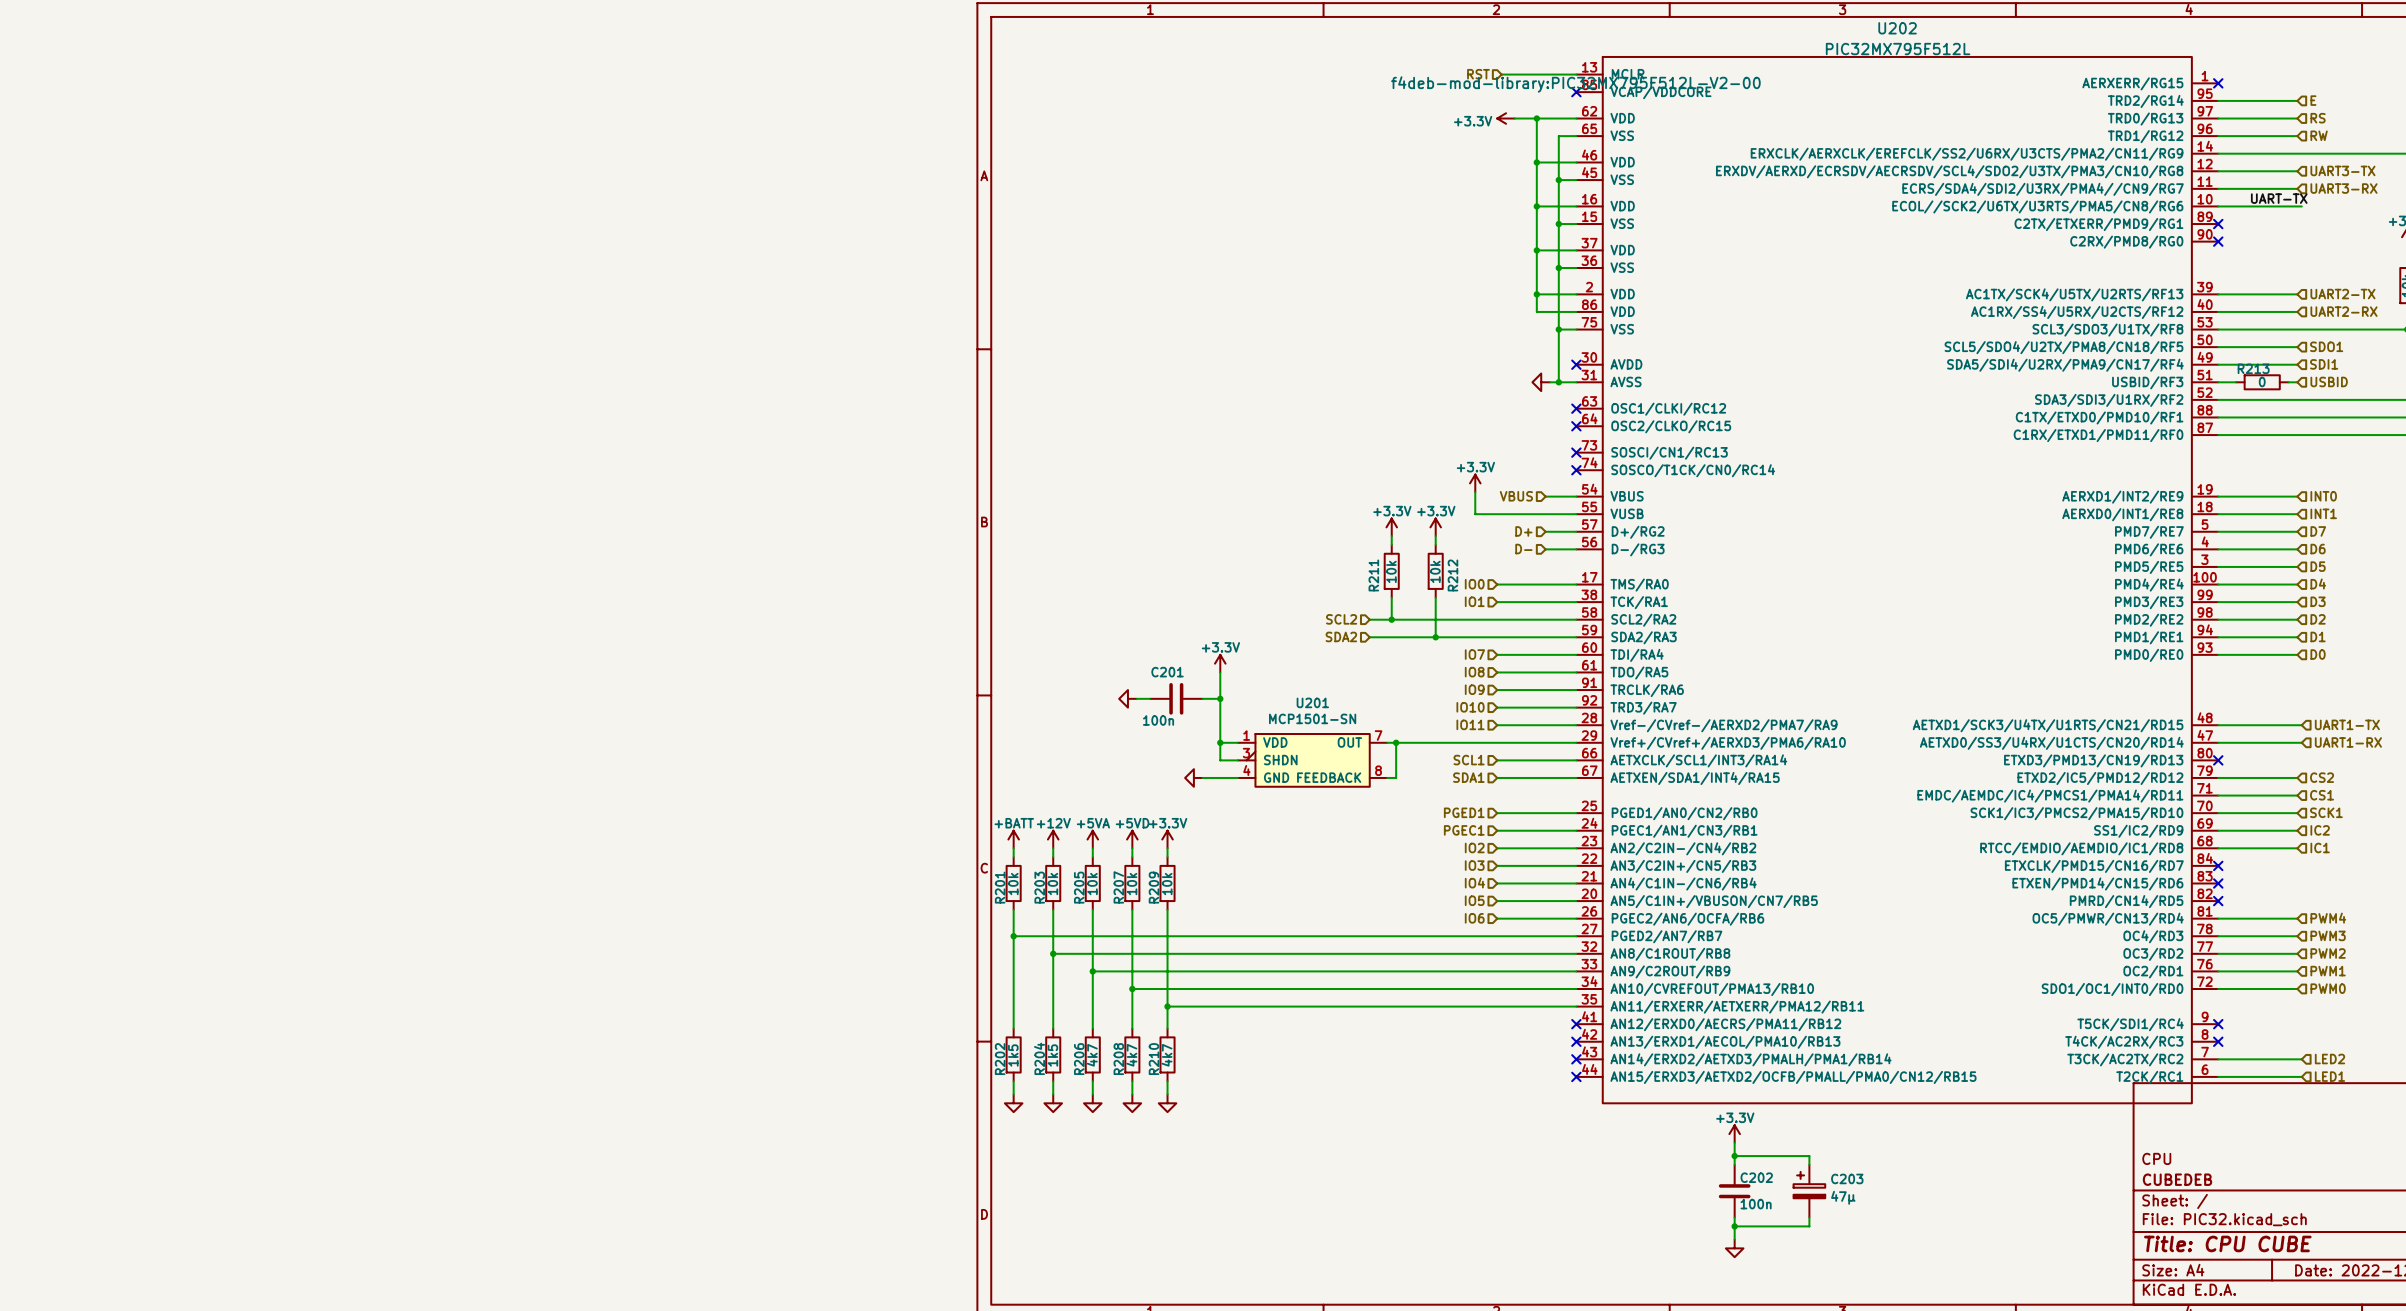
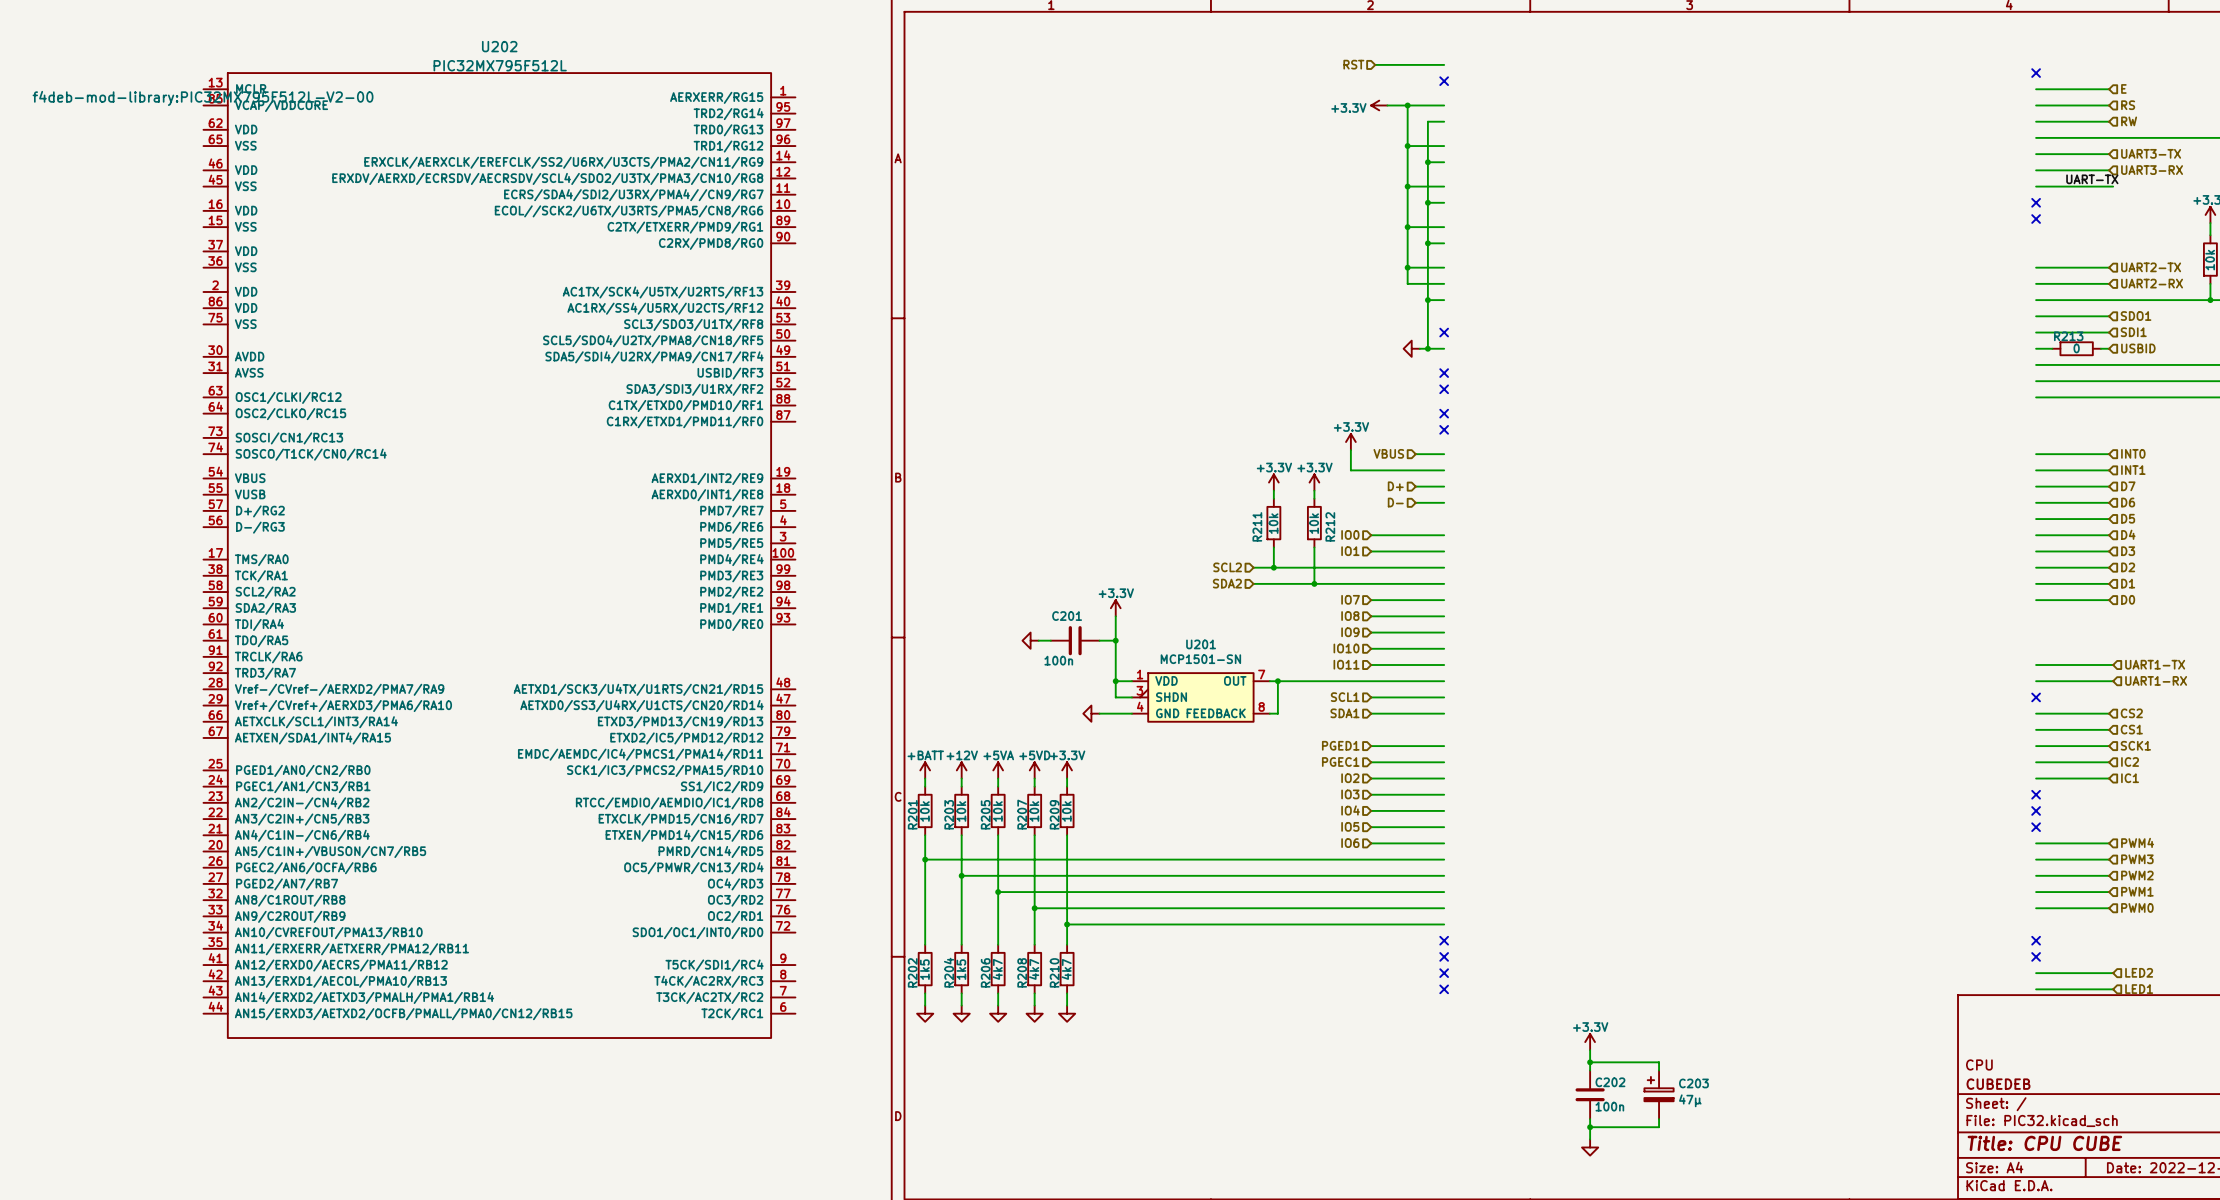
U202 position: (1897, 580) -> (499, 555)

